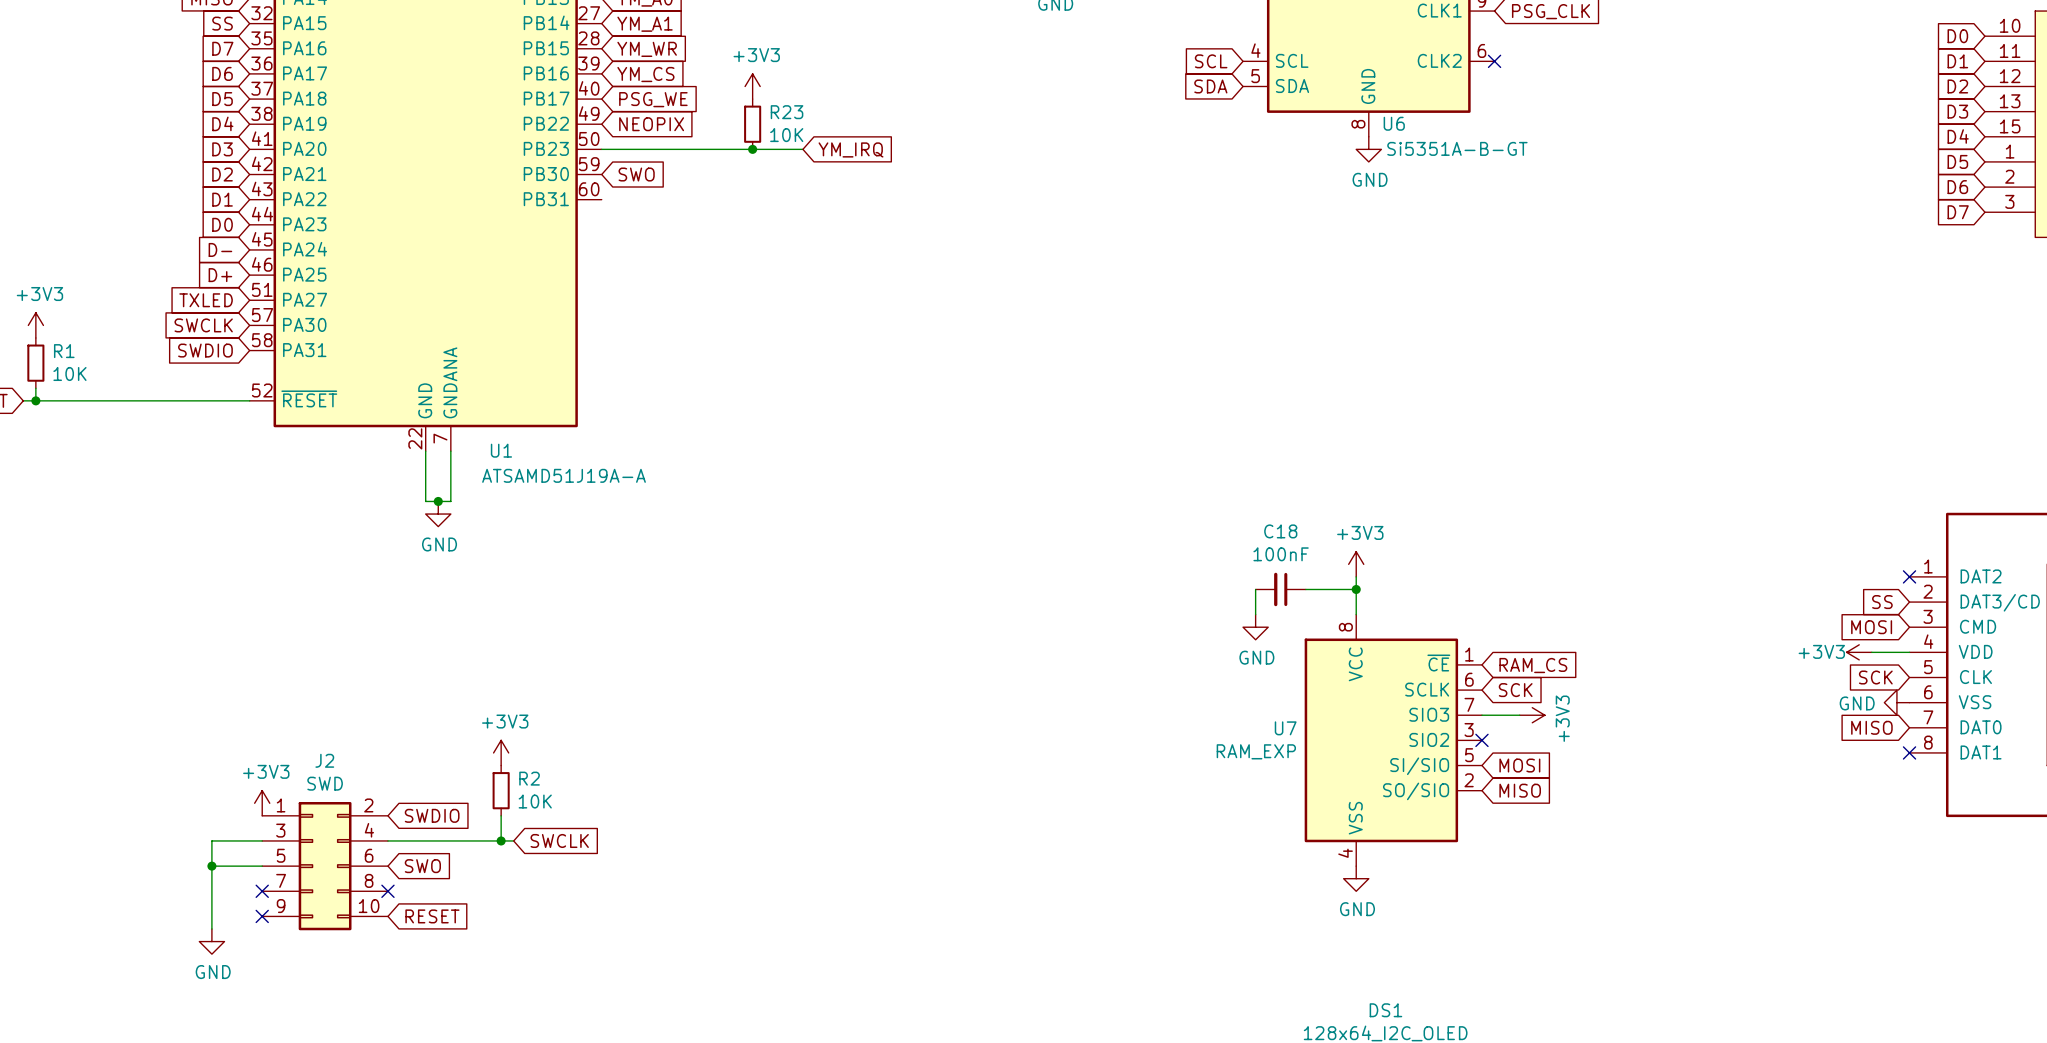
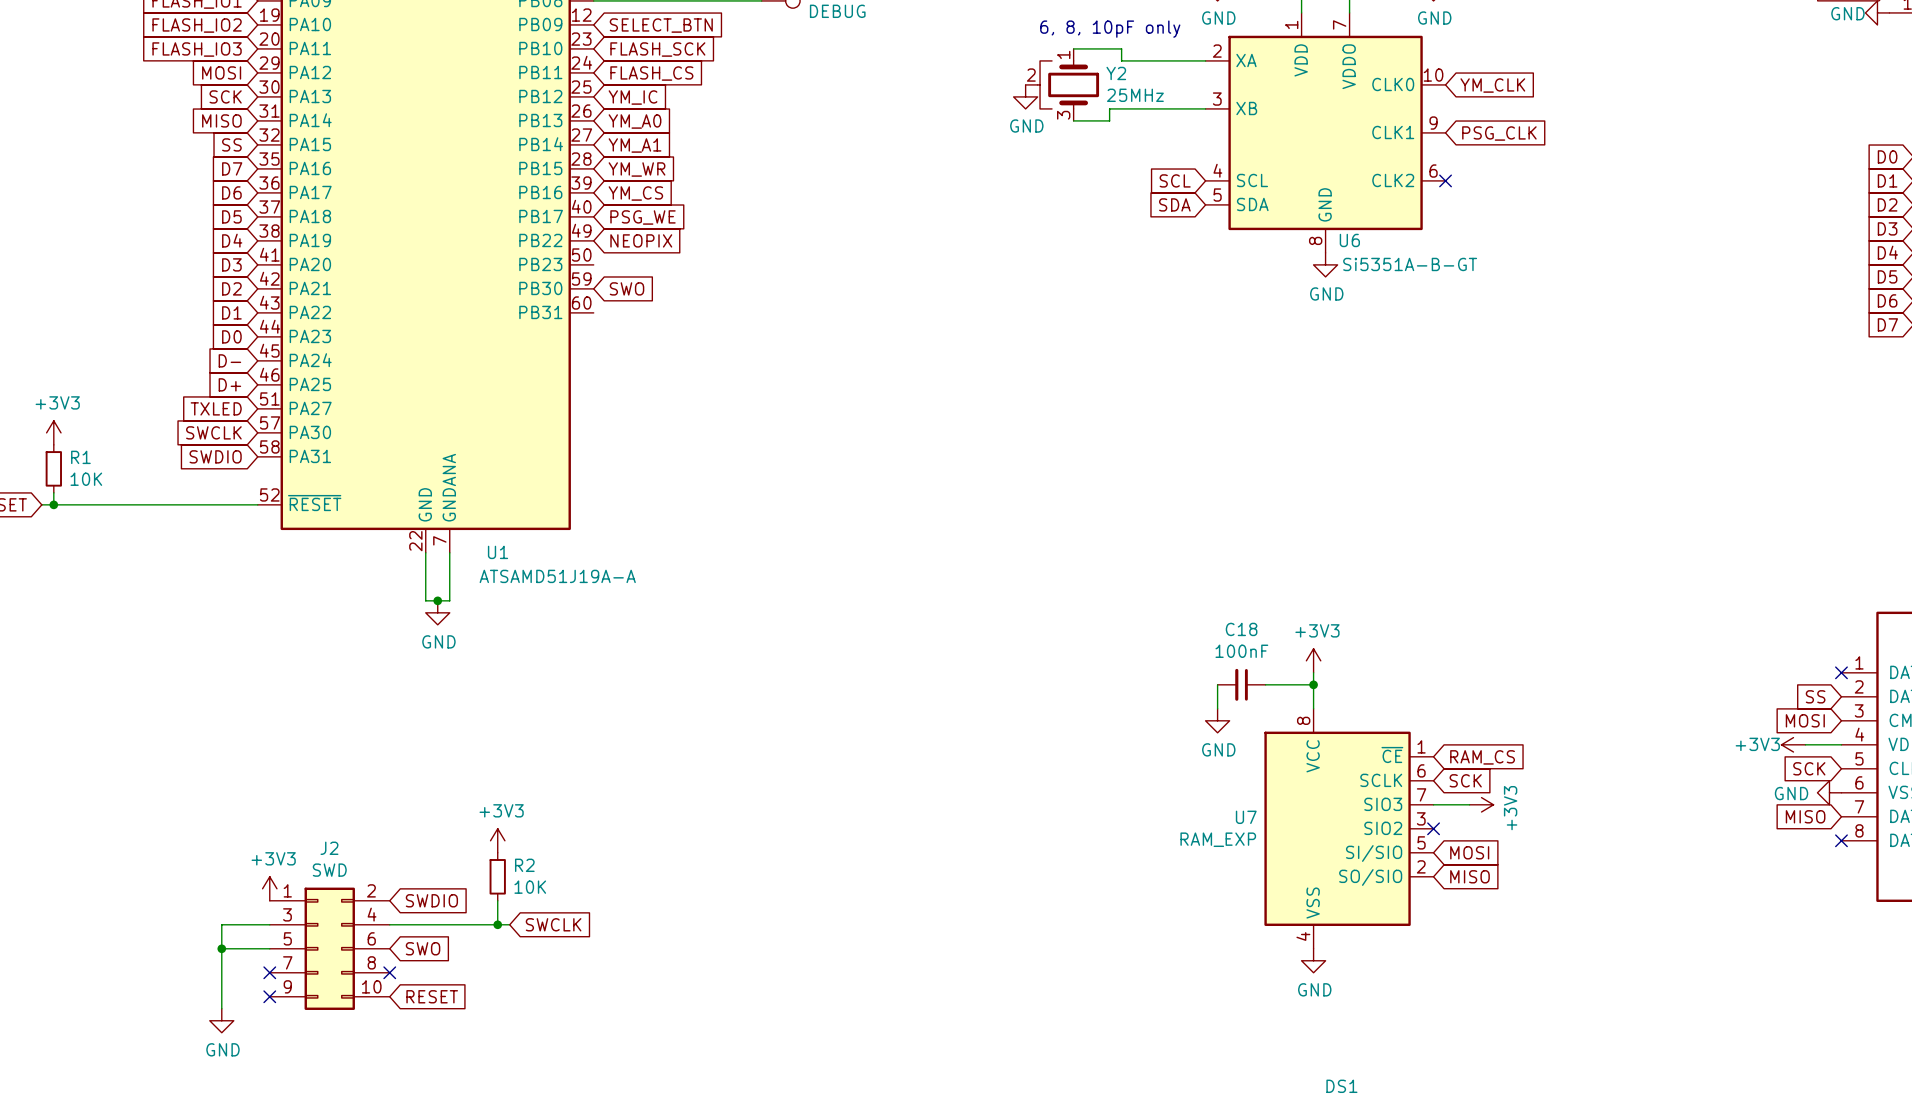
power symbol: +3V3 (752, 86) -> none
R23: 10K (752, 124) -> none
wire: (601, 149) (802, 149) -> none
junction: (752, 149) -> none
global label: YM_IRQ (851, 149) -> none

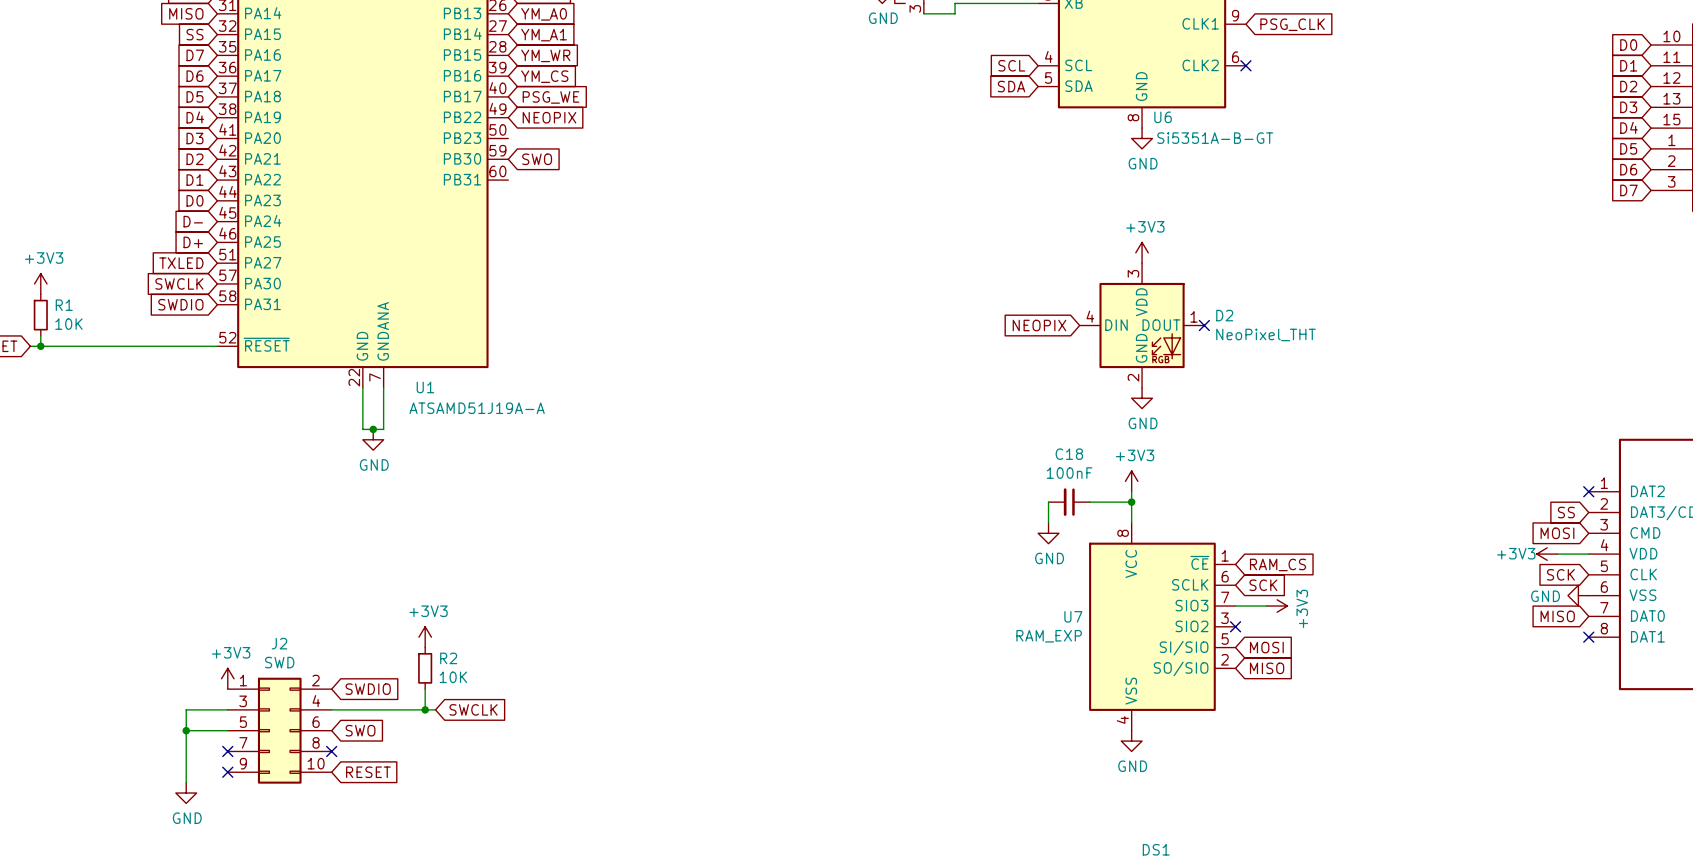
power symbol: none -> +3V3 (1142, 252)
global label: none -> NEOPIX (1039, 325)
D2: none -> NeoPixel_THT (1142, 325)
no-connect mark: none -> (1204, 325)
power symbol: none -> GND (1142, 398)

